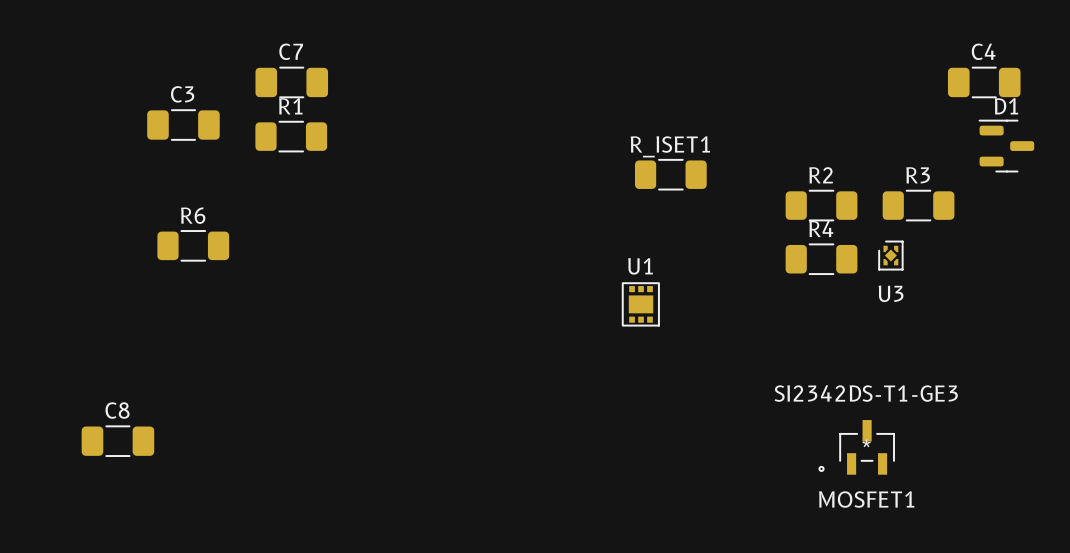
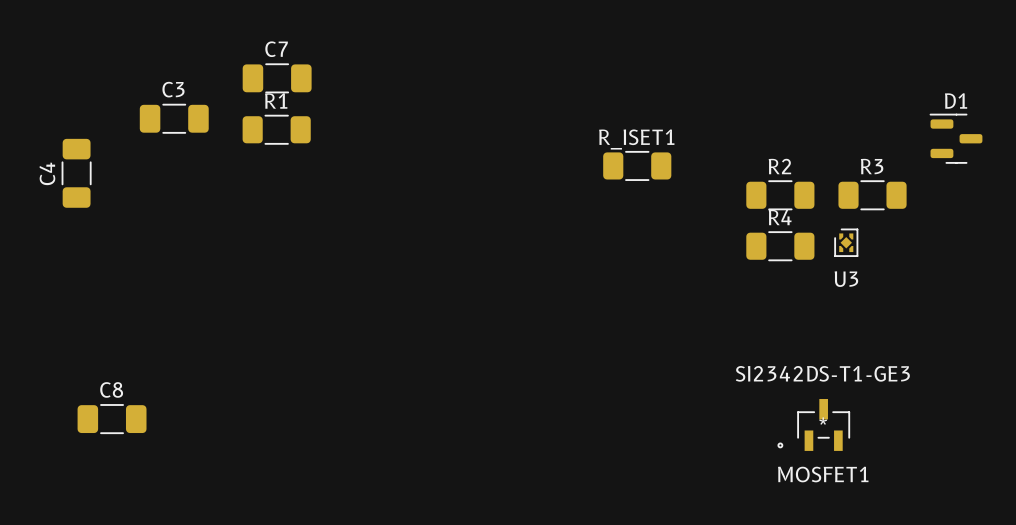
C4 name position: C4 (983, 51) -> C4 (47, 173)
C4 rotation: 0° (984, 82) -> 90° clockwise (76, 173)
C4 position: (984, 82) -> (76, 173)
R6: (193, 245) -> none
U1: (640, 304) -> none

